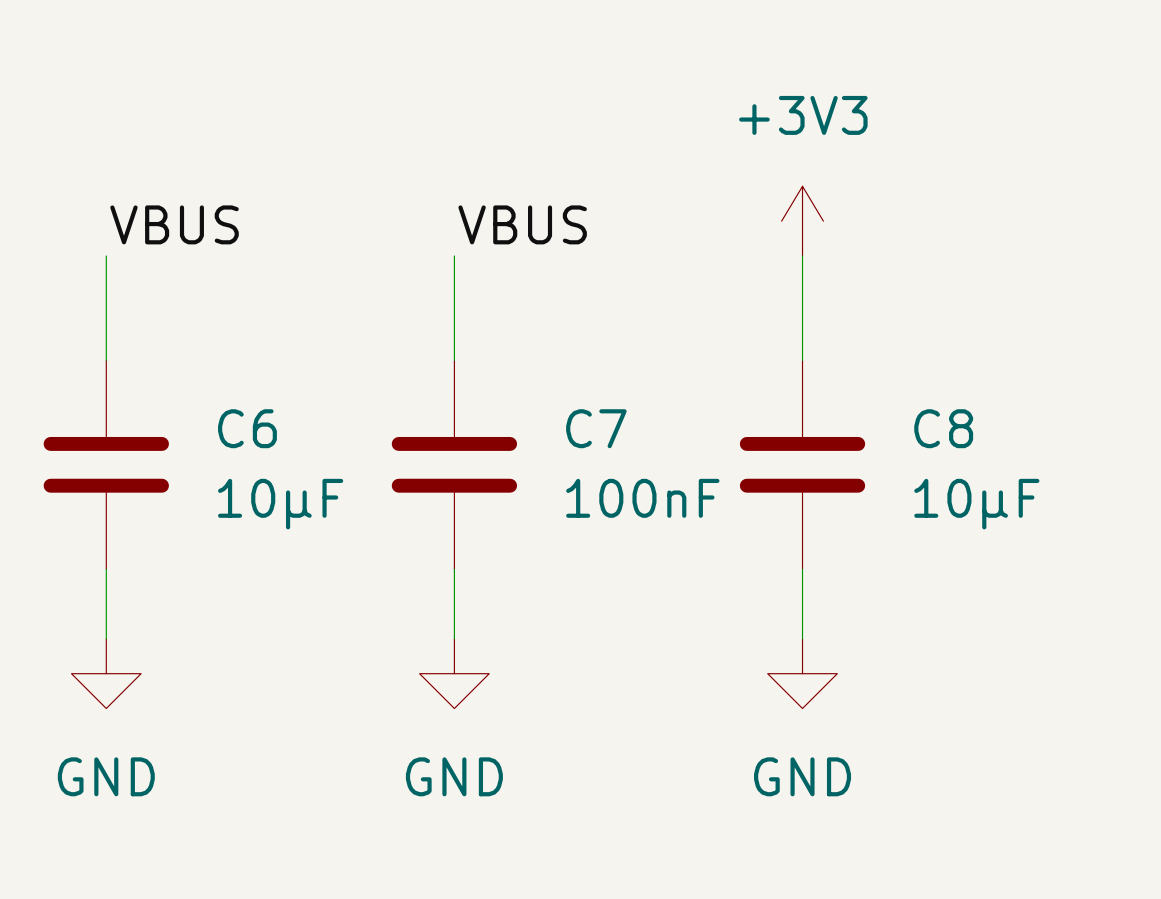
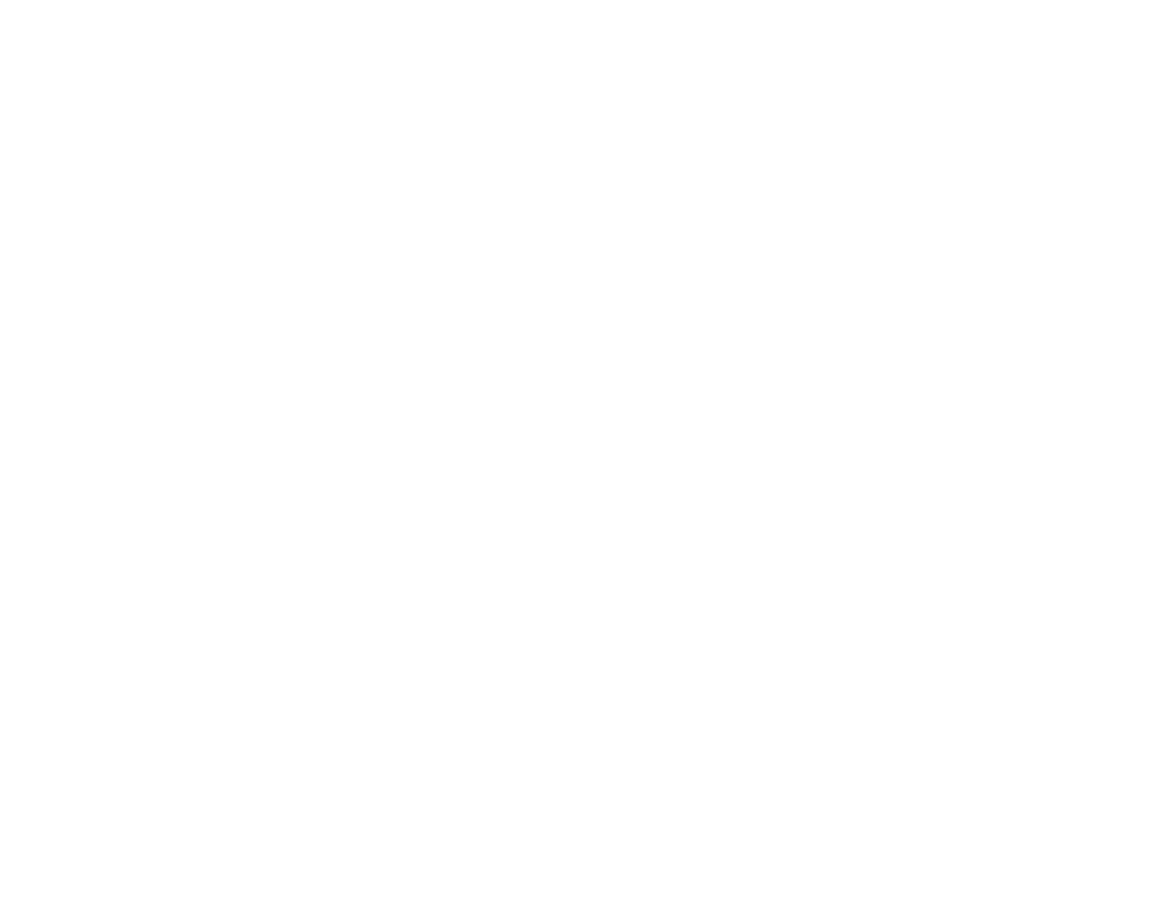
power symbol: +3V3 (802, 221) -> none
label: VBUS (174, 224) -> none
label: VBUS (522, 224) -> none
wire: (106, 255) (106, 360) -> none
wire: (454, 255) (454, 360) -> none
wire: (802, 255) (802, 360) -> none
C6: 10µF (106, 464) -> none
C7: 100nF (454, 464) -> none
C8: 10µF (802, 464) -> none
wire: (106, 569) (106, 638) -> none
wire: (454, 569) (454, 638) -> none
wire: (802, 569) (802, 638) -> none
power symbol: GND (106, 673) -> none
power symbol: GND (454, 673) -> none
power symbol: GND (802, 673) -> none

